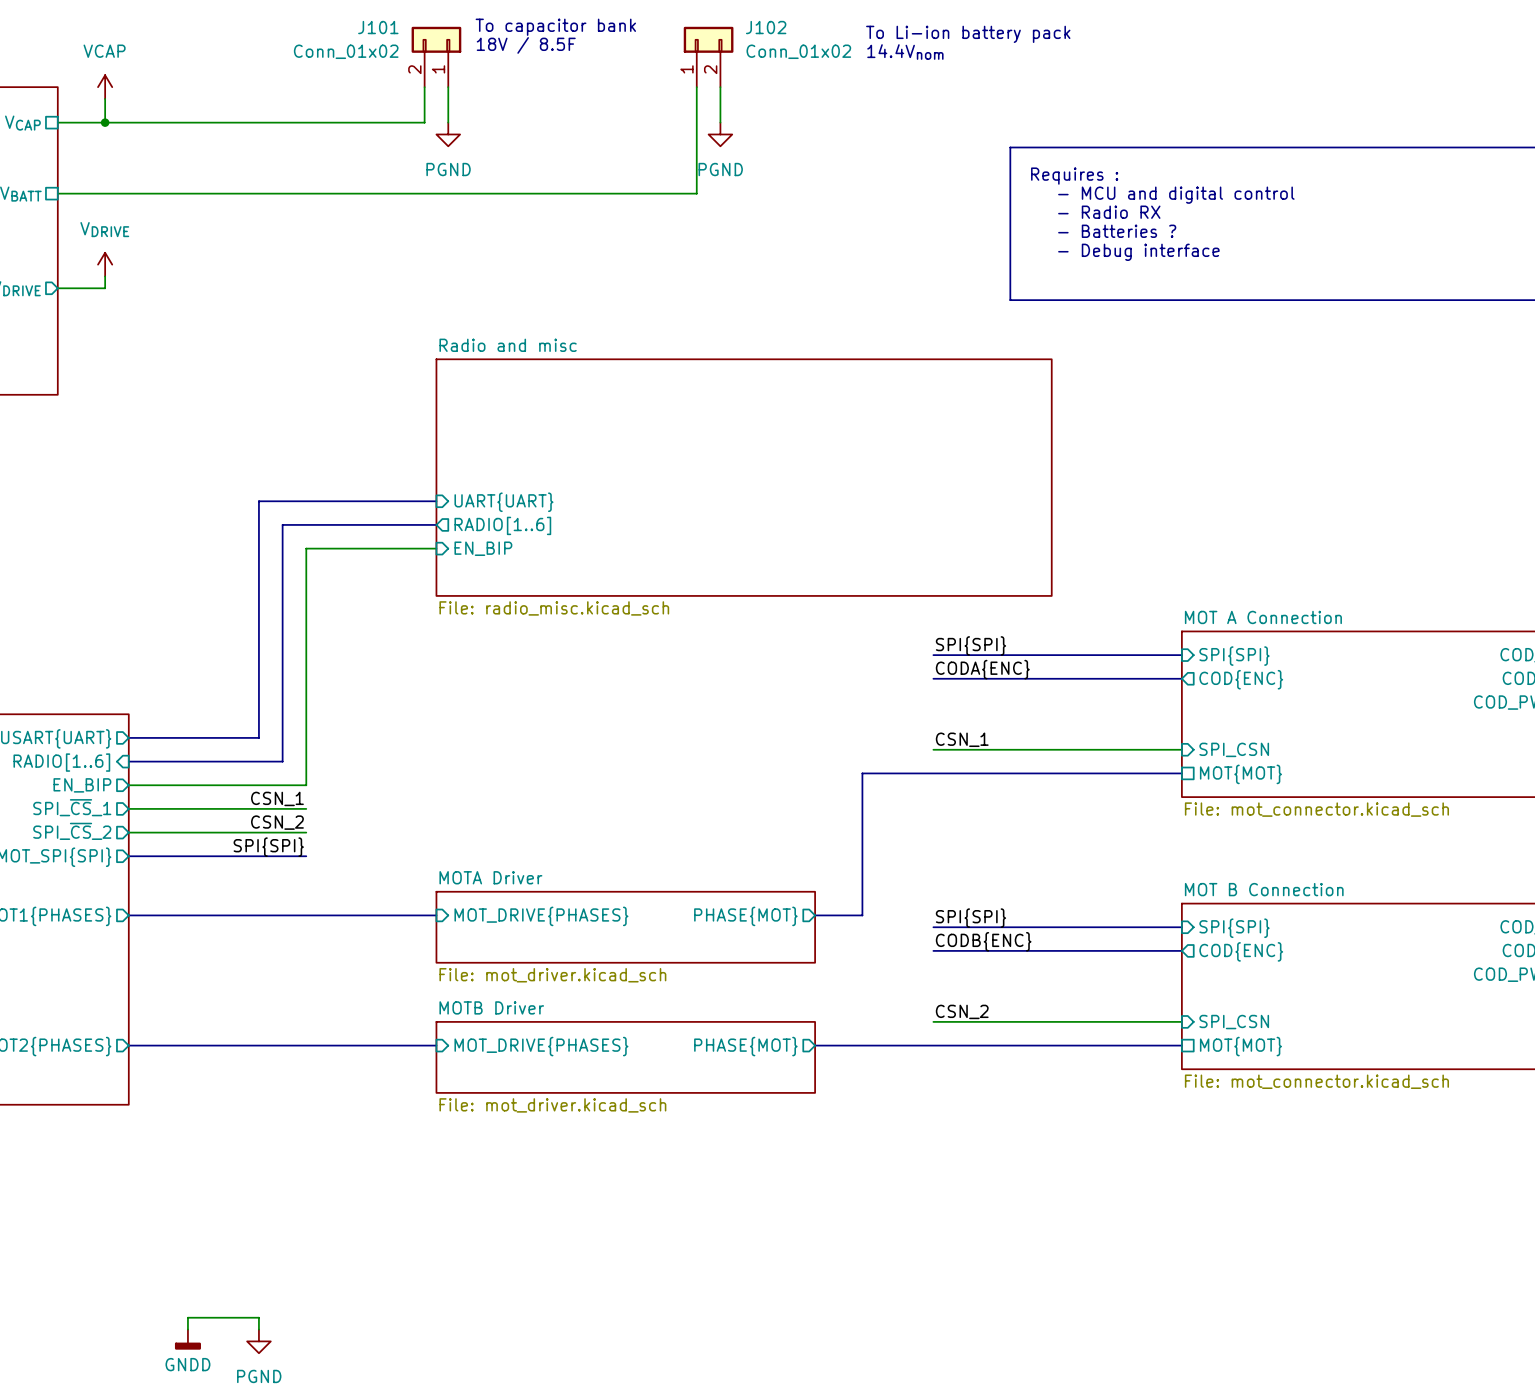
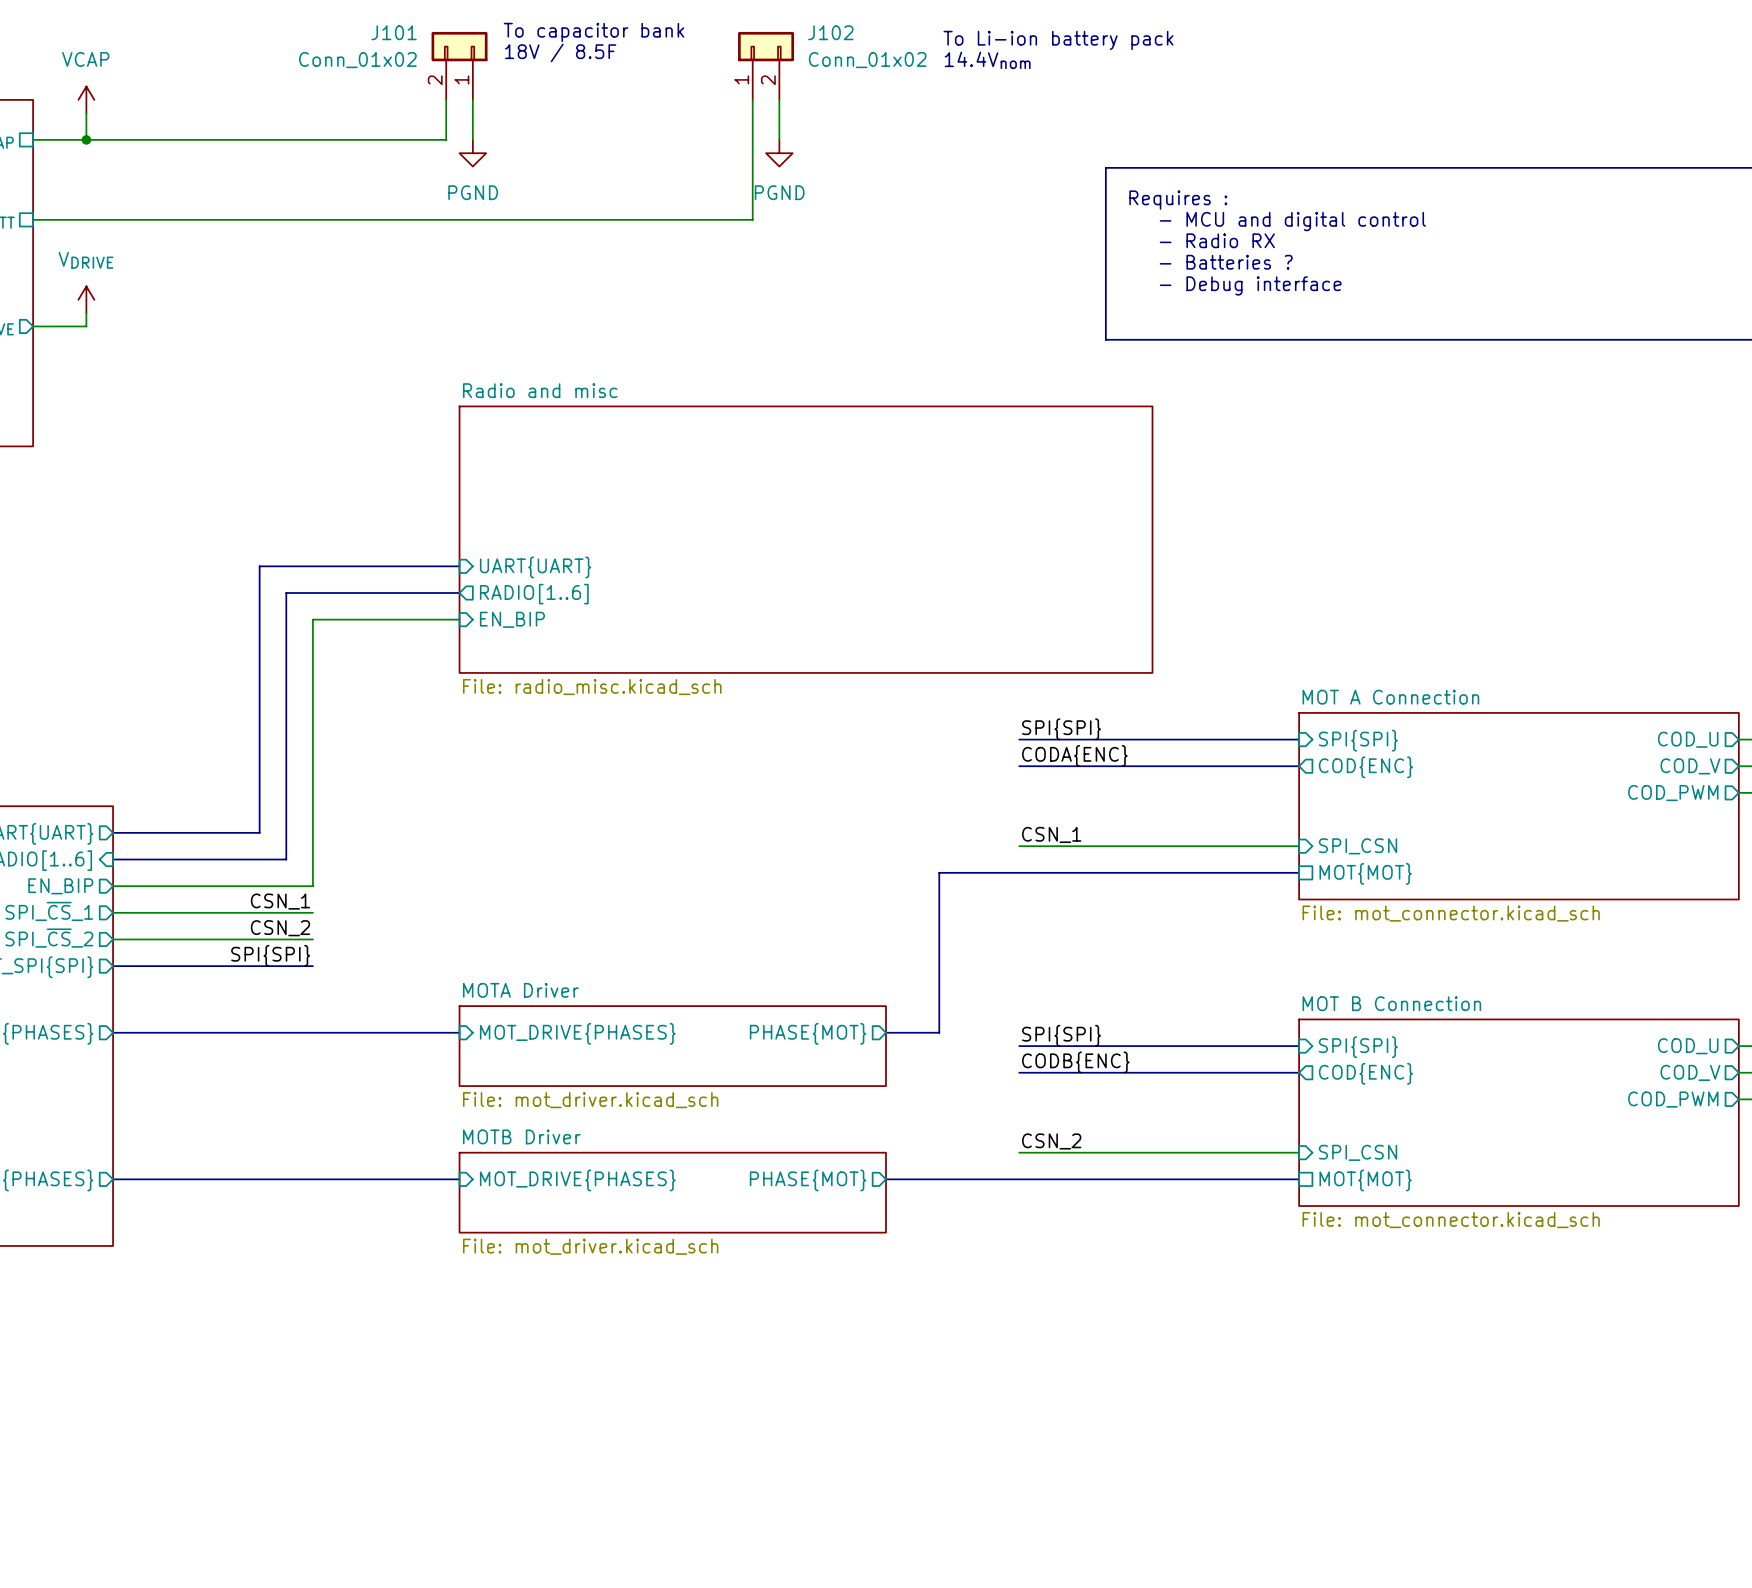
wire: (187, 1329) (187, 1317) (258, 1317) (258, 1329) -> none
power symbol: GNDD (187, 1339) -> none
power symbol: PGND (258, 1341) -> none

